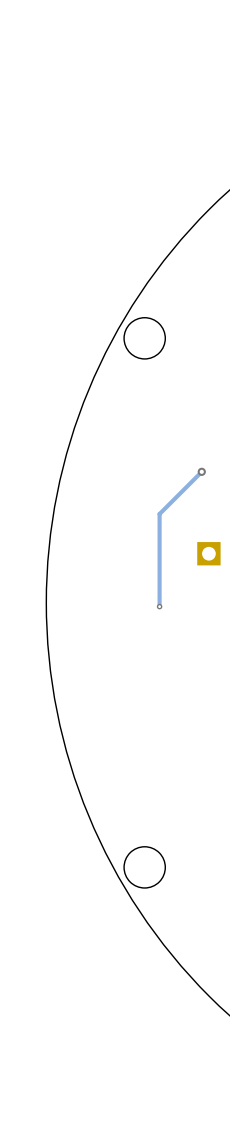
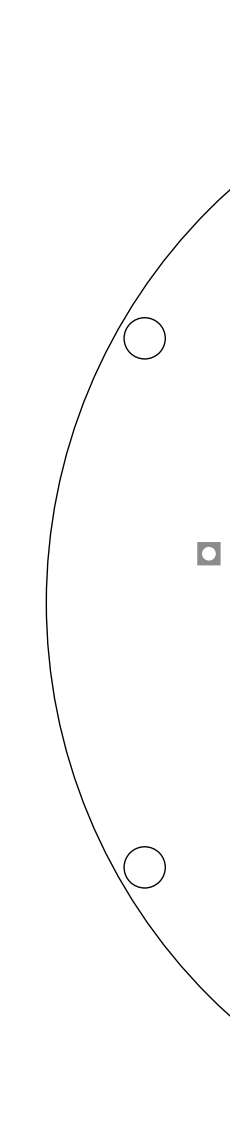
track: (201, 471) (159, 514) (159, 606) -> none
via: (201, 471) -> none
via: (159, 606) -> none

